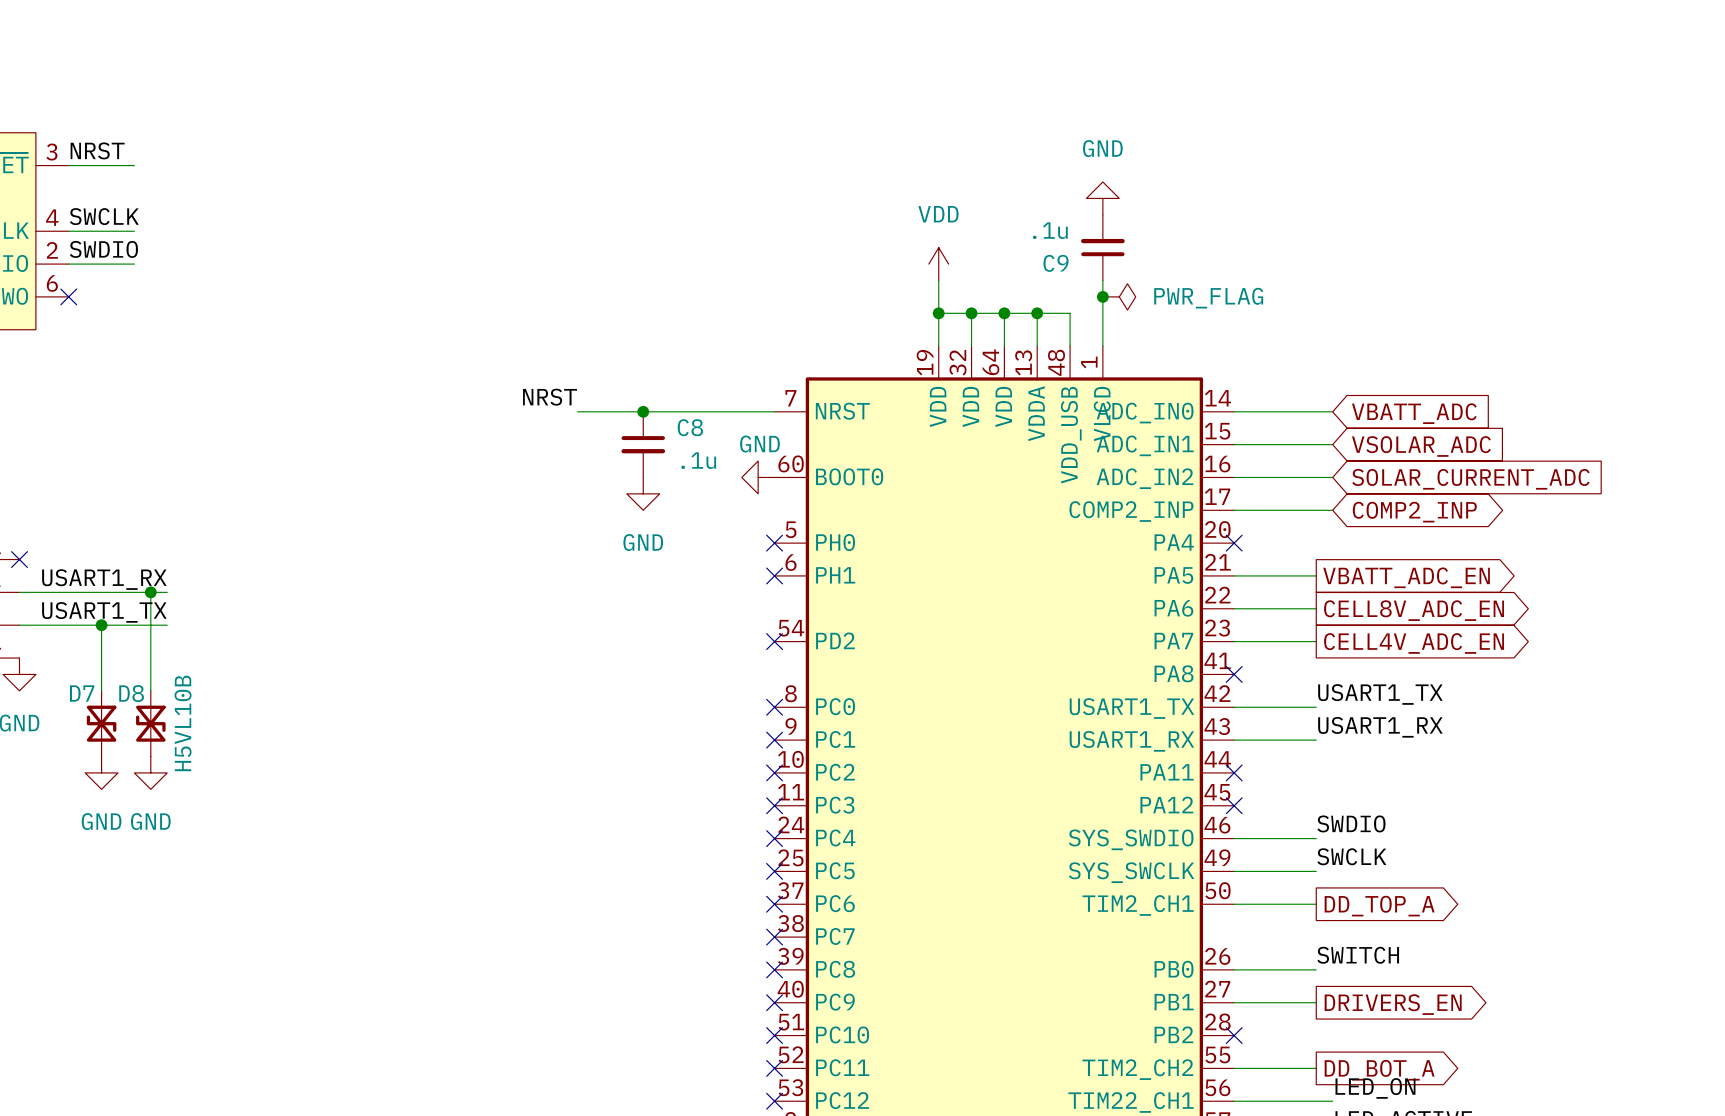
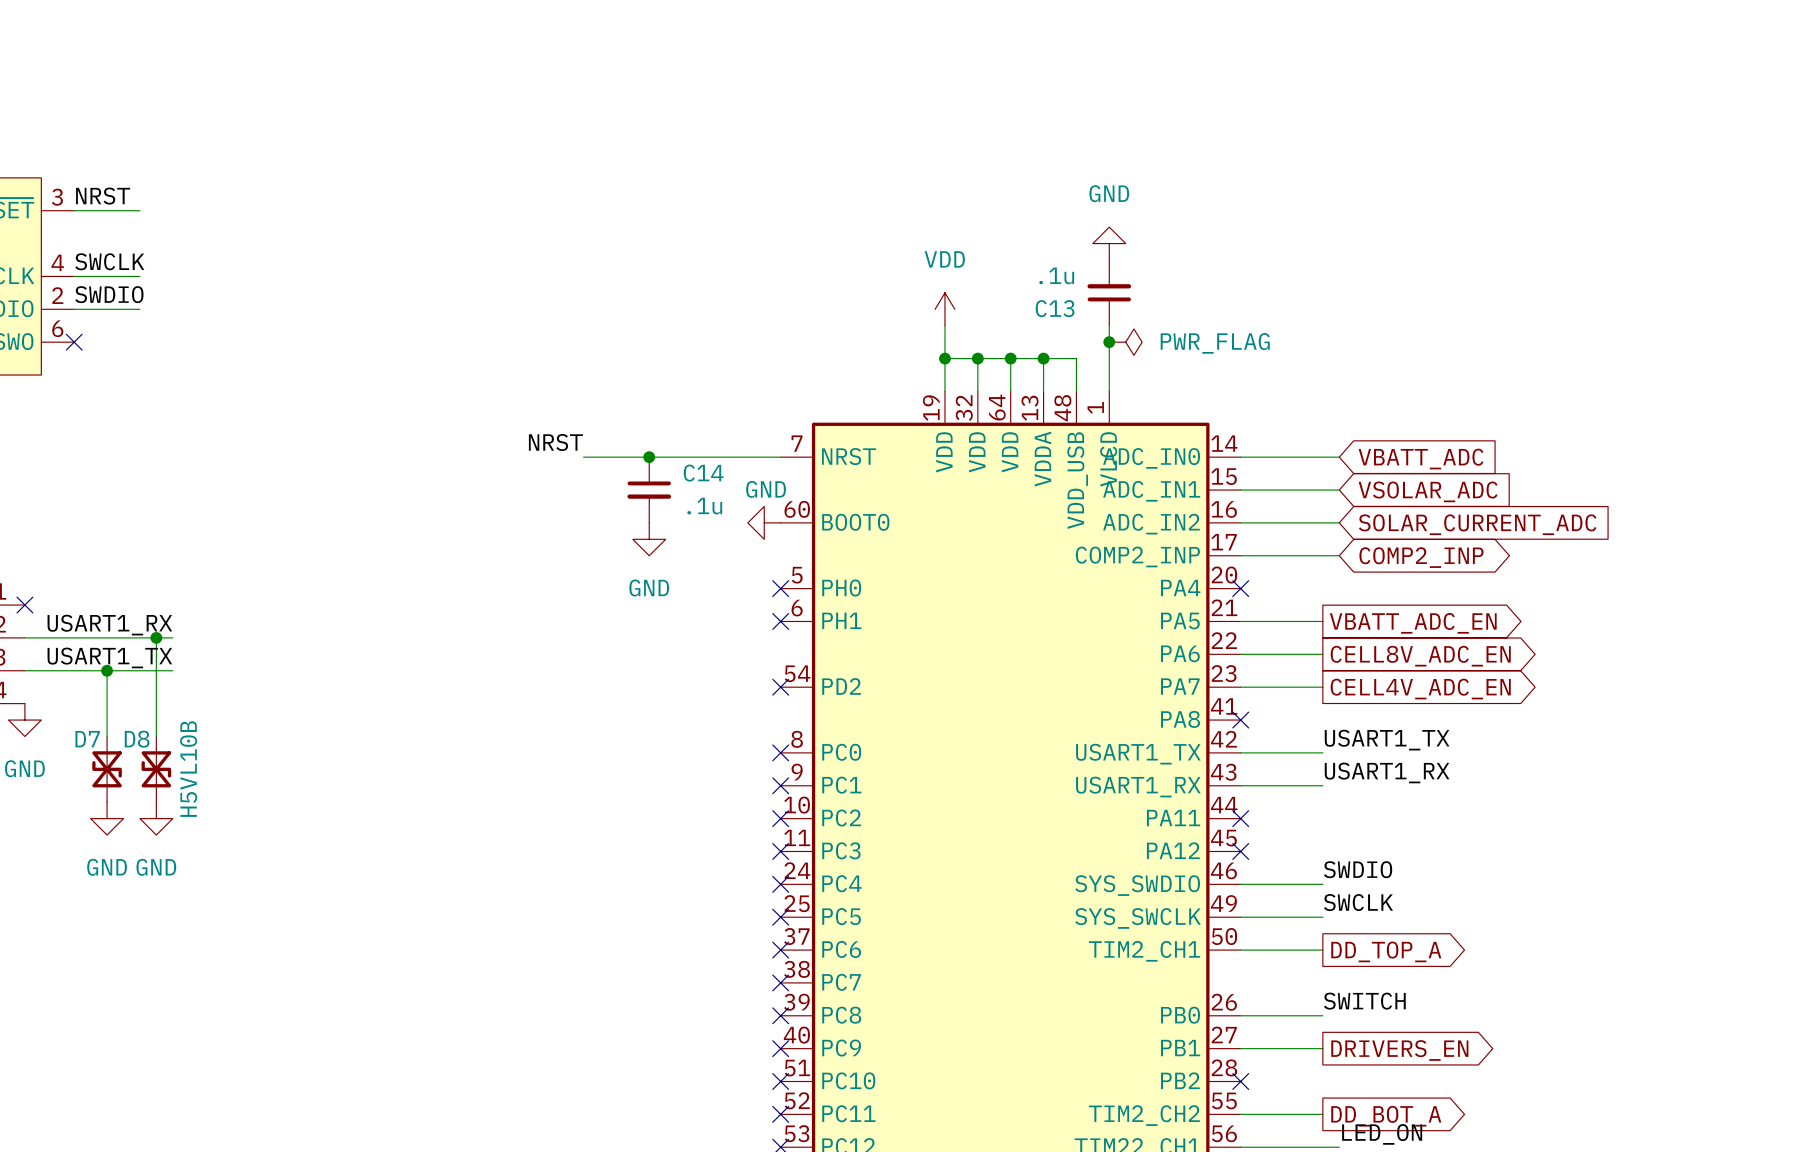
C9 name: C9 (1056, 263) -> C13 (1055, 308)
C8 name: C8 (690, 427) -> C14 (703, 473)

